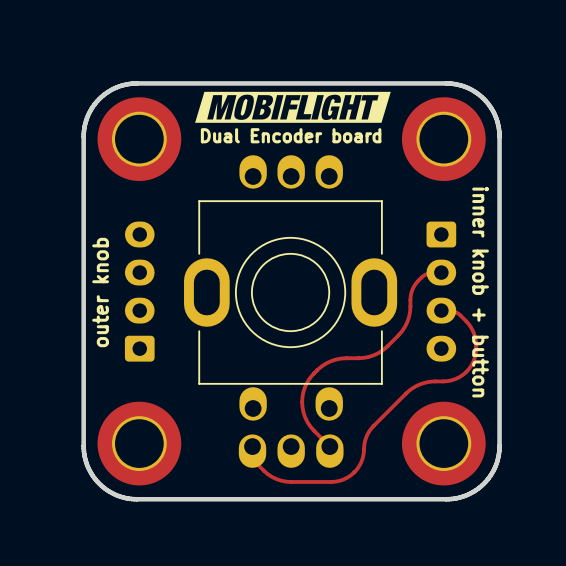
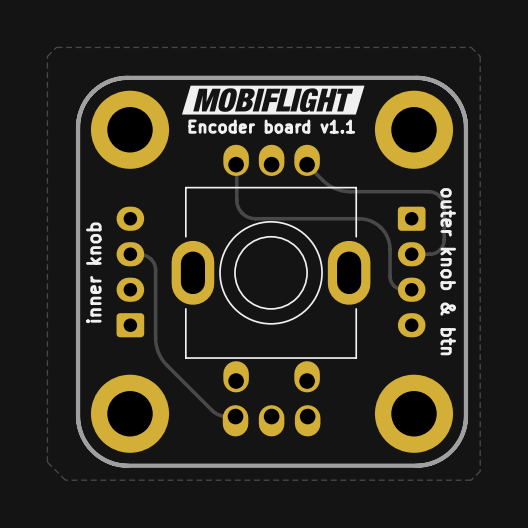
zone outline: none -> (56, 47) (471, 47) (480, 56) (480, 471) (471, 480) (65, 480) (47, 462) (47, 56) (56, 47)
text: Dual Encoder board (291, 135) -> Encoder board v1.1 (271, 126)
track: none -> (236, 164) (237, 203) (244, 214) (255, 218) (359, 218) (371, 221) (381, 227) (389, 241) (391, 282) (399, 289) (411, 289)
track: none -> (307, 164) (326, 183) (340, 190) (428, 191) (438, 195) (444, 205) (443, 245) (435, 253) (417, 254)
track: (441, 272) (427, 273) (416, 282) (410, 294) (407, 322) (401, 331) (383, 349) (369, 356) (342, 358) (330, 361) (320, 367) (309, 379) (302, 394) (303, 412) (310, 426) (329, 446) -> none
text: outer knob (100, 292) -> inner knob (93, 272)
text: inner knob + button (480, 292) -> outer knob & btn (448, 271)
track: (447, 310) (459, 314) (473, 332) (476, 348) (471, 364) (466, 371) (455, 378) (423, 383) (406, 393) (369, 430) (365, 439) (361, 461) (354, 472) -> none
track: (252, 446) (252, 455) (256, 462) (267, 474) (281, 480) (335, 481) (347, 477) (354, 472) -> (235, 416) (221, 415) (214, 412) (162, 359) (155, 341) (155, 266) (151, 259) (146, 255) (128, 255)

